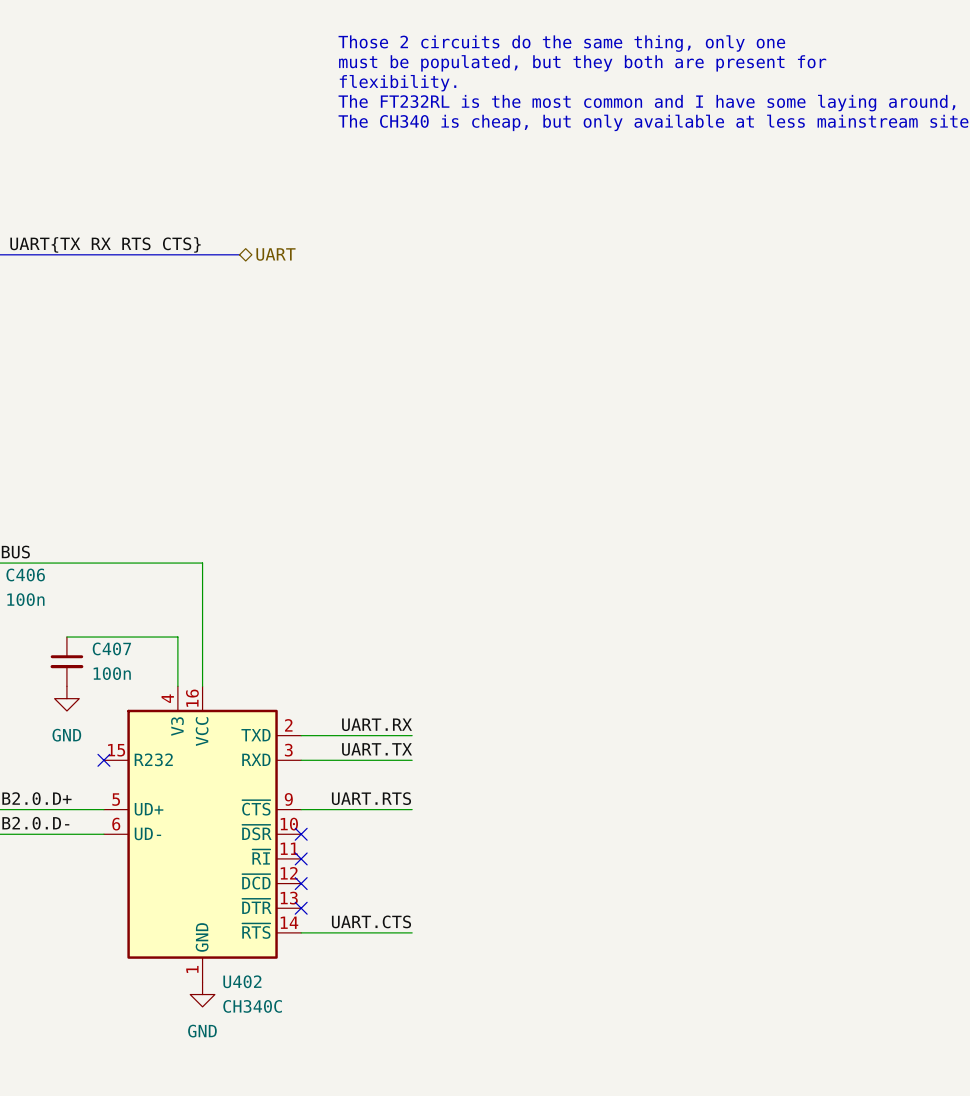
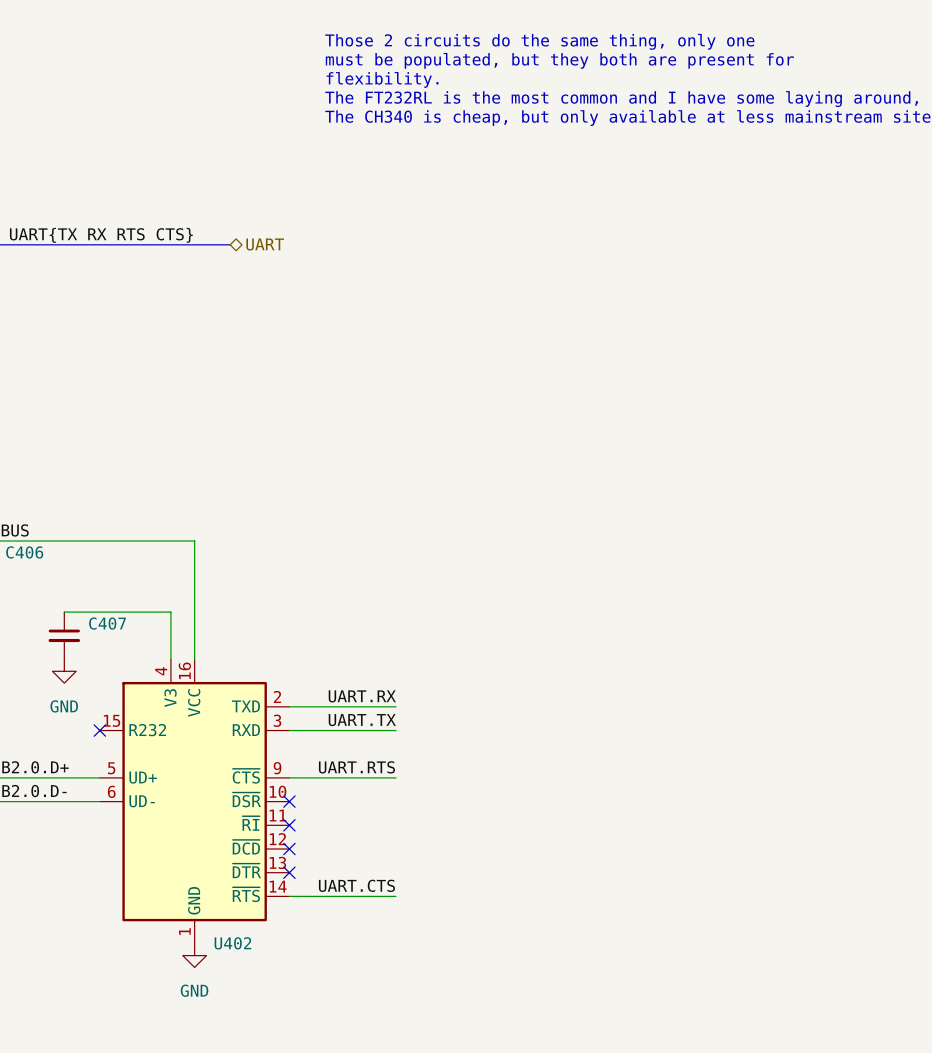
C406 value: 100n (25, 599) -> none
C407 value: 100n (112, 673) -> none
U402 value: CH340C (252, 1006) -> none

